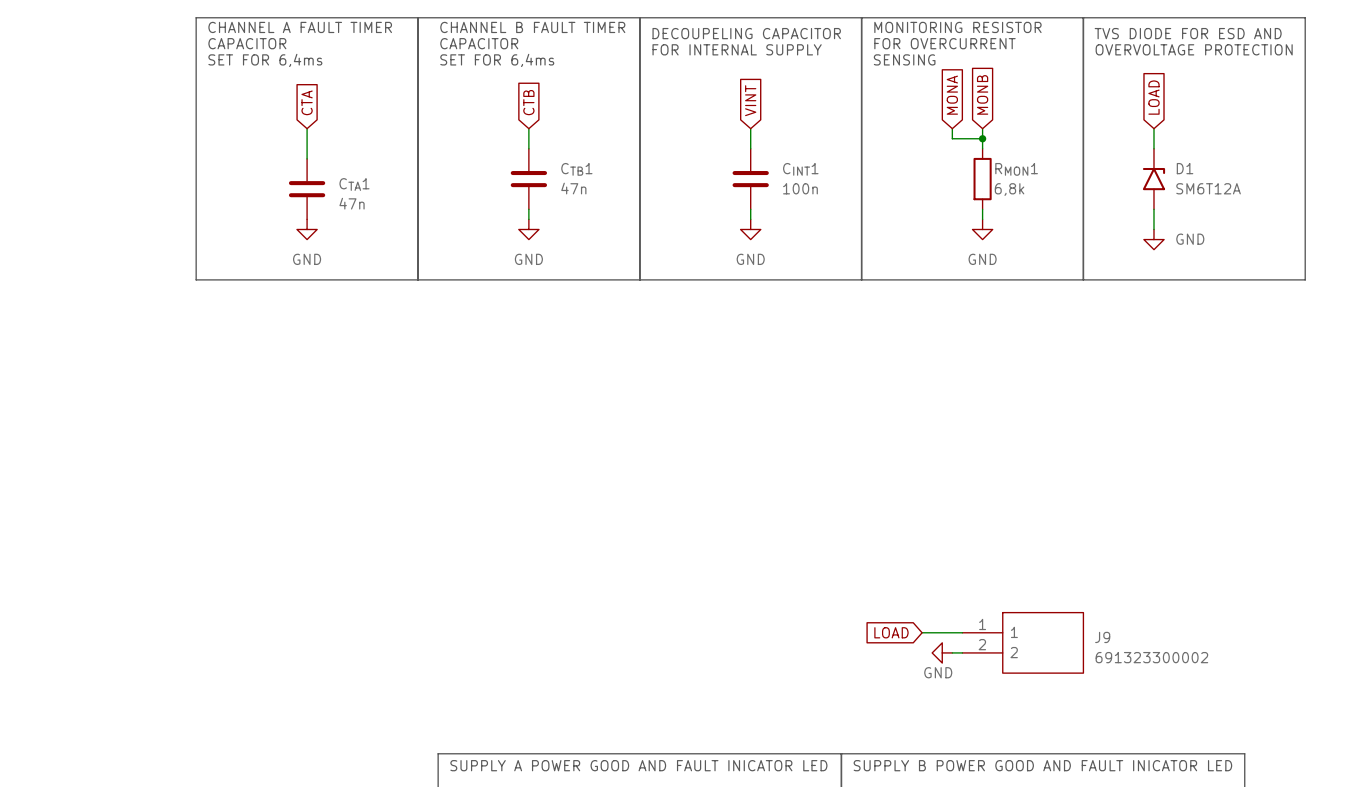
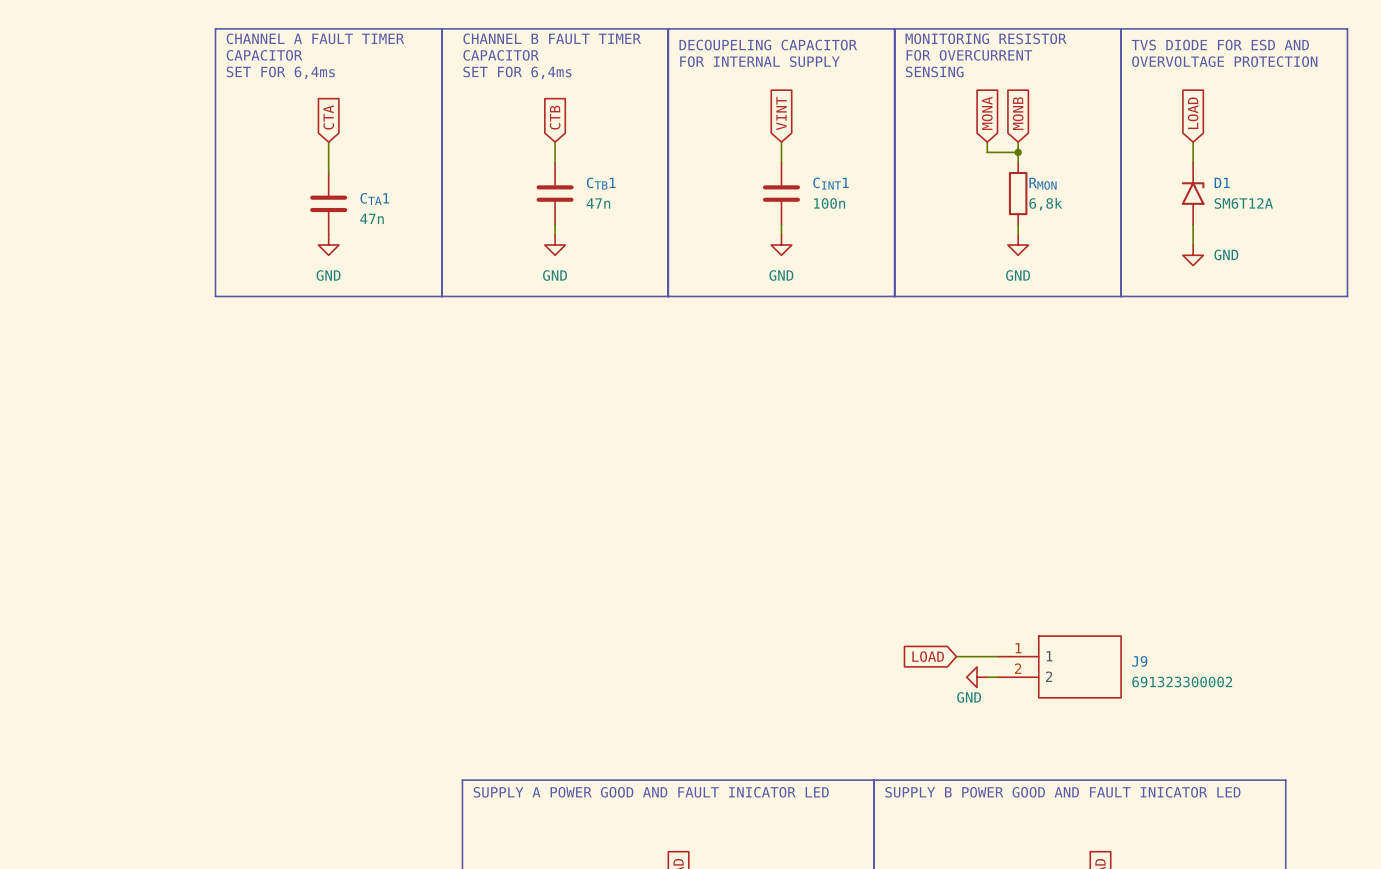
RMON1 name: RMON1 (1016, 169) -> RMON (1043, 183)

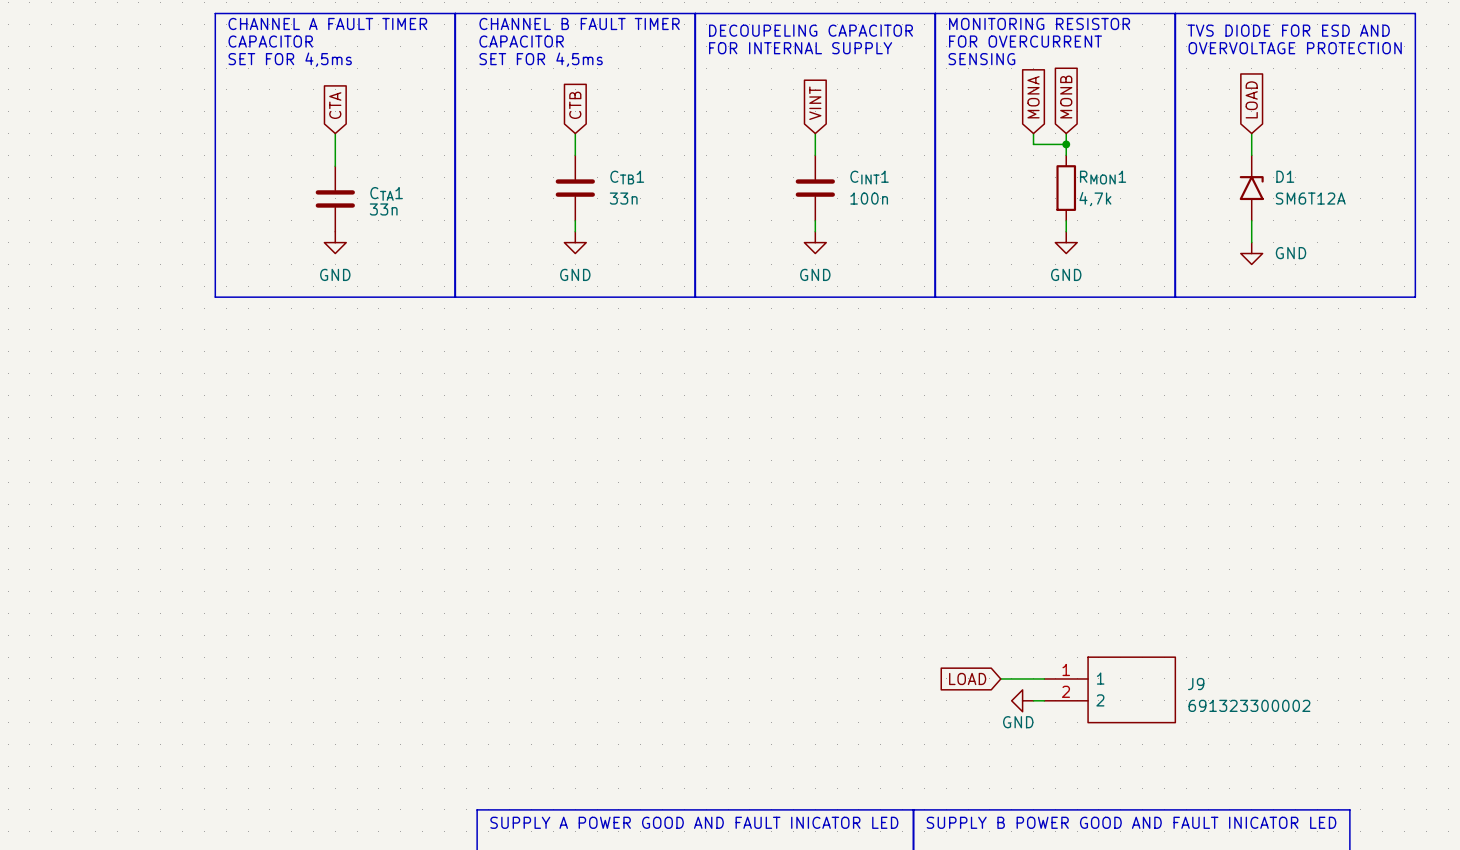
text: SET FOR 6,4ms (280, 72) -> SET FOR 4,5ms (290, 59)
text: SET FOR 6,4ms (517, 72) -> SET FOR 4,5ms (541, 59)
RMON name: RMON (1043, 183) -> RMON1 (1103, 177)
CTB1 value: 47n (598, 203) -> 33n (623, 198)
RMON value: 6,8k (1045, 204) -> 4,7k (1095, 199)
CTA1 value: 47n (372, 218) -> 33n (383, 209)

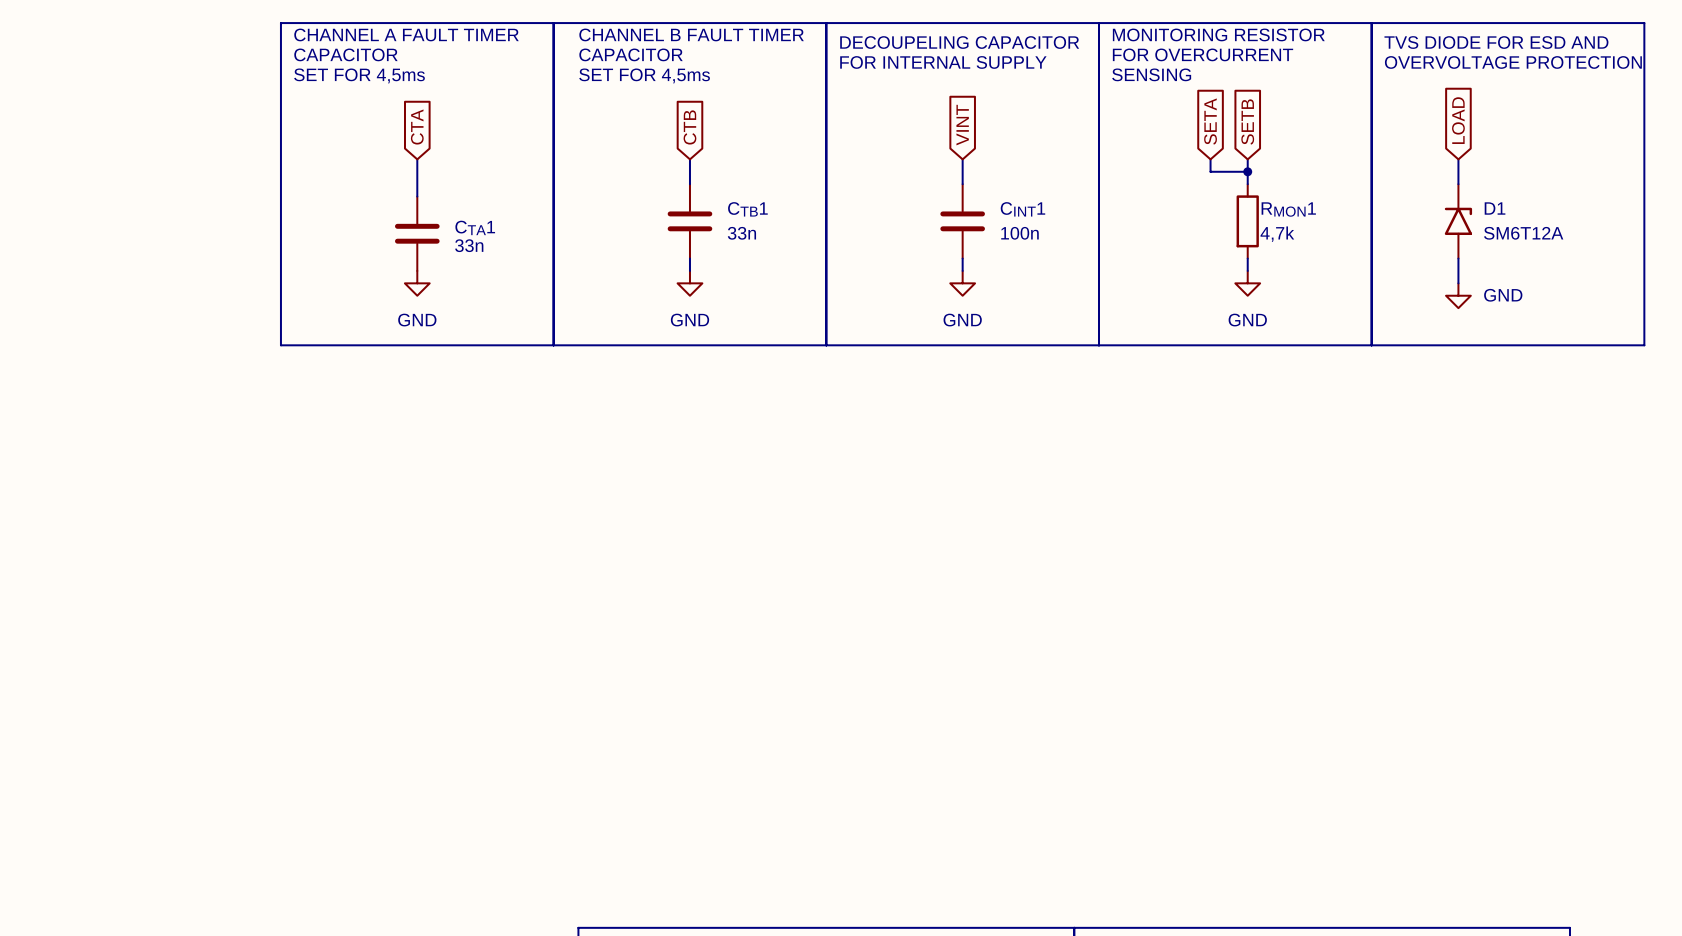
global label: MONA (1033, 97) -> SETA (1210, 121)
global label: MONB (1066, 97) -> SETB (1247, 121)
global label: LOAD (967, 678) -> none
wire: (1000, 678) (1044, 678) -> none
J9: 691323300002 (1110, 689) -> none
power symbol: GND (1022, 700) -> none
wire: (1033, 700) (1044, 700) -> none

